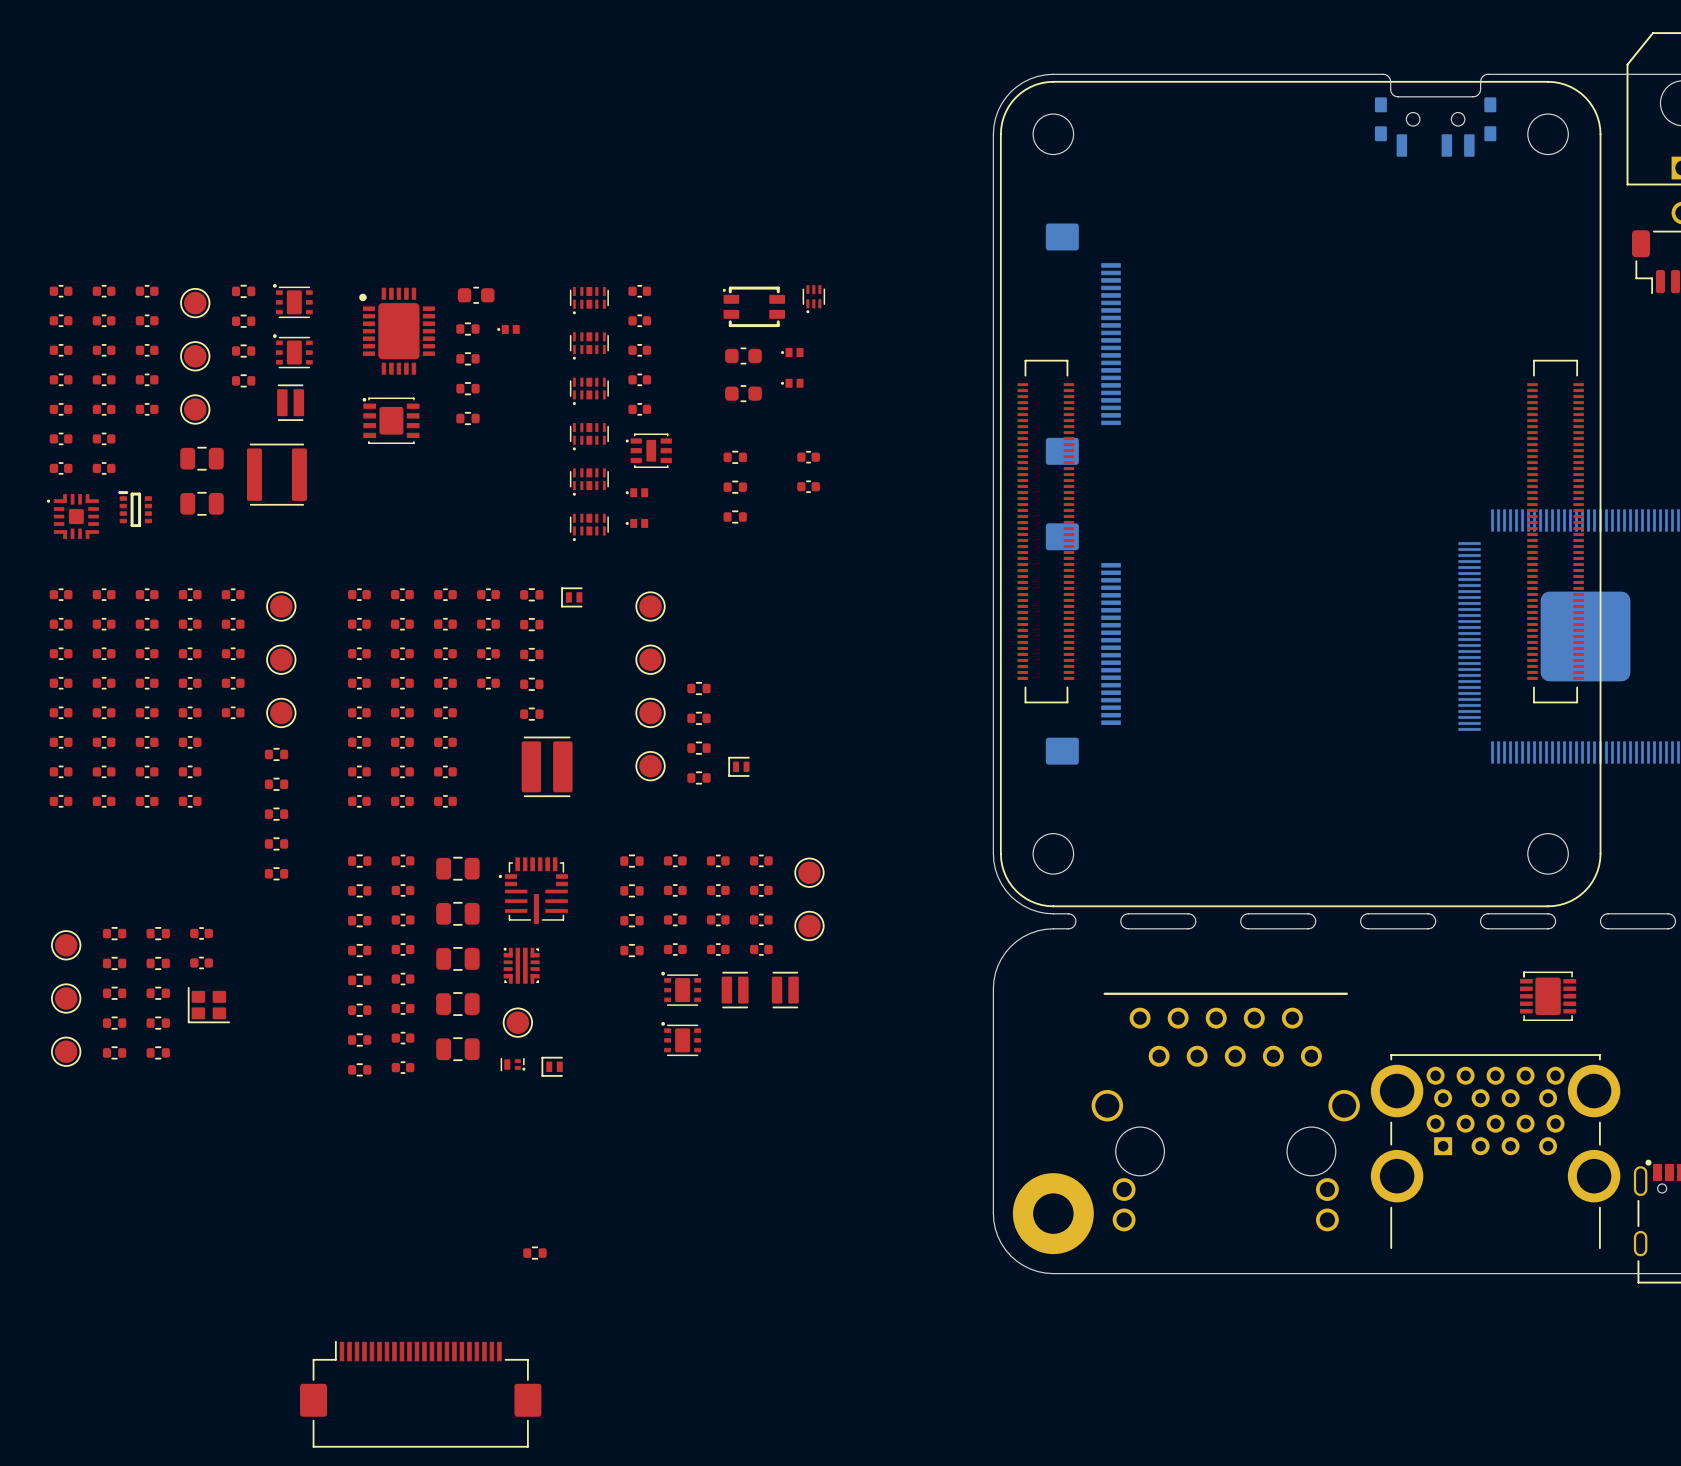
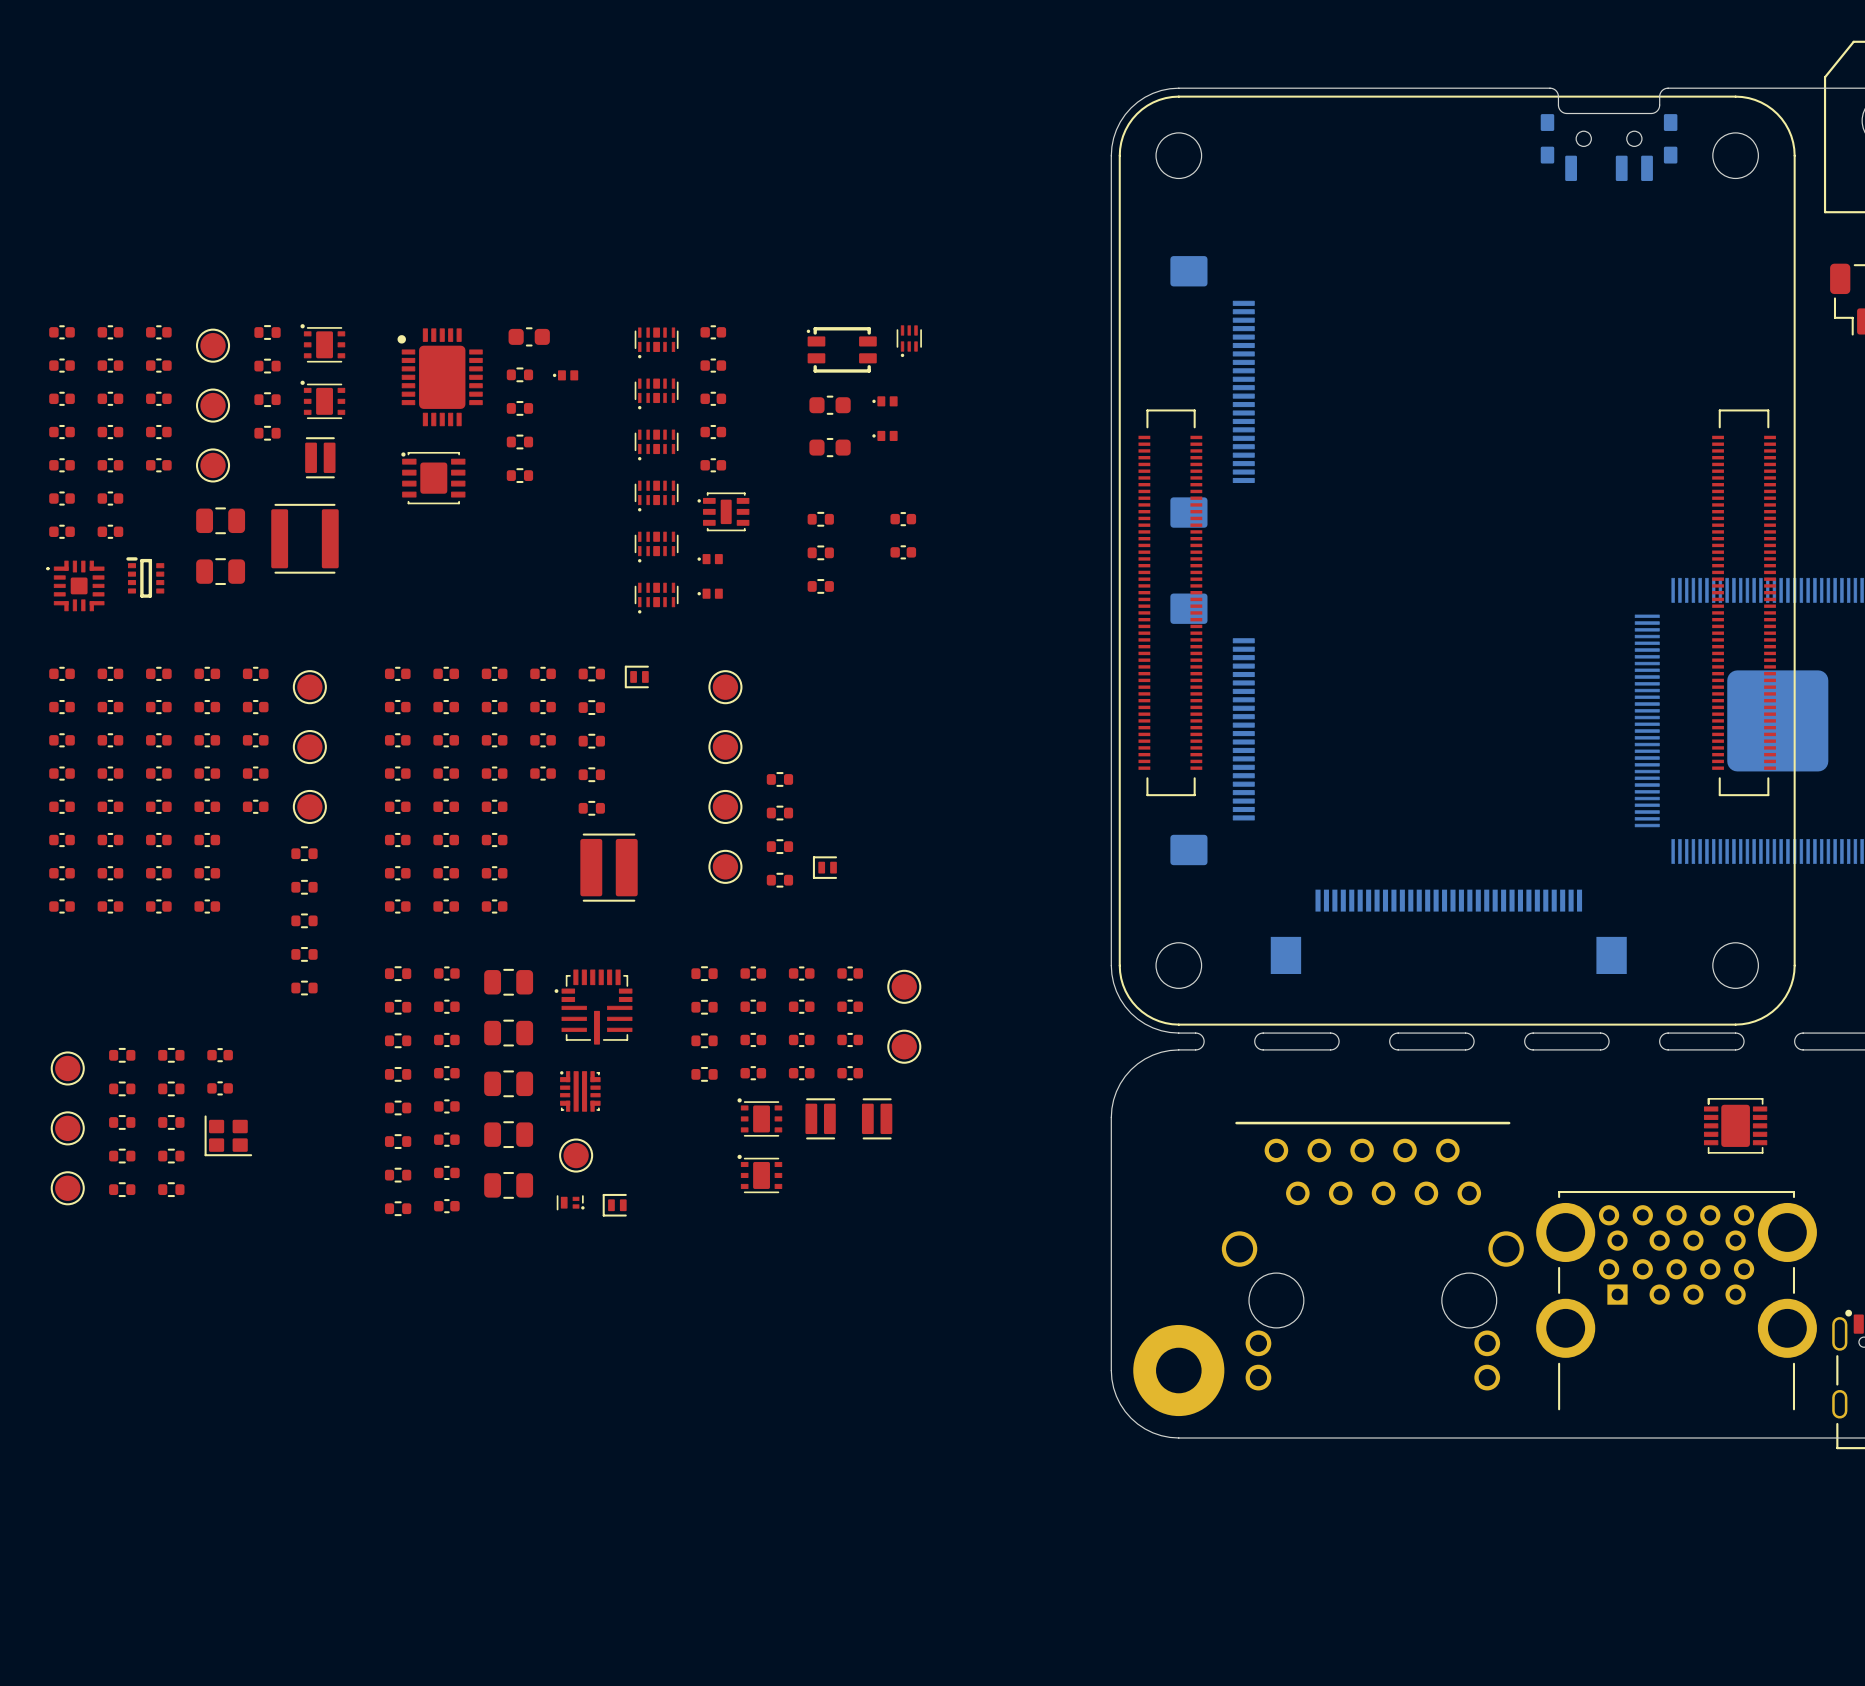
part: none -> (1448, 931)
part: (534, 1253) -> none
part: (420, 1394) -> none

